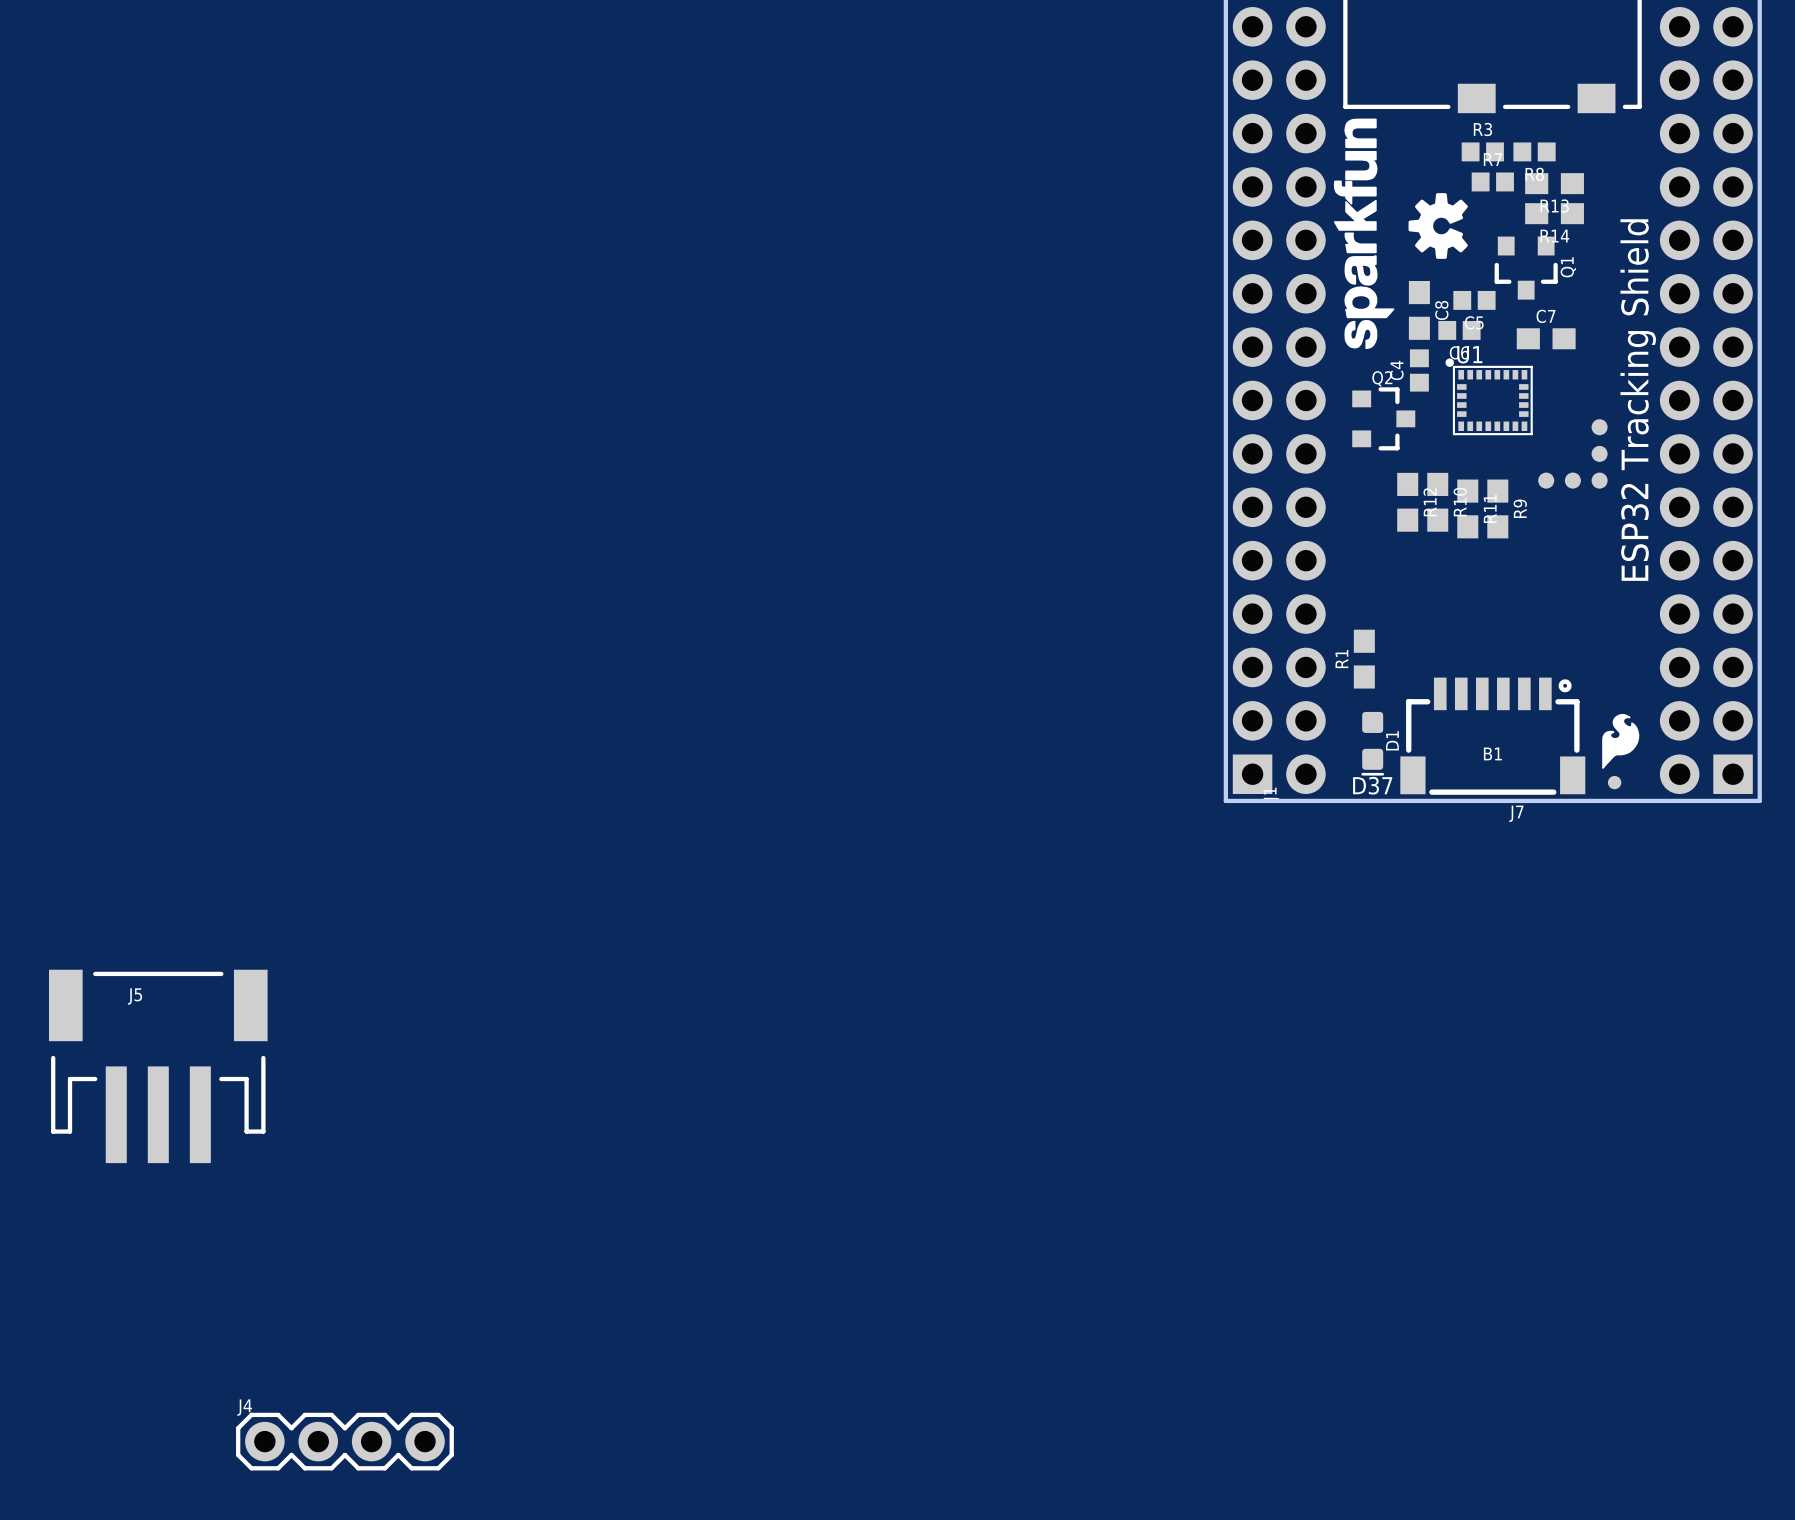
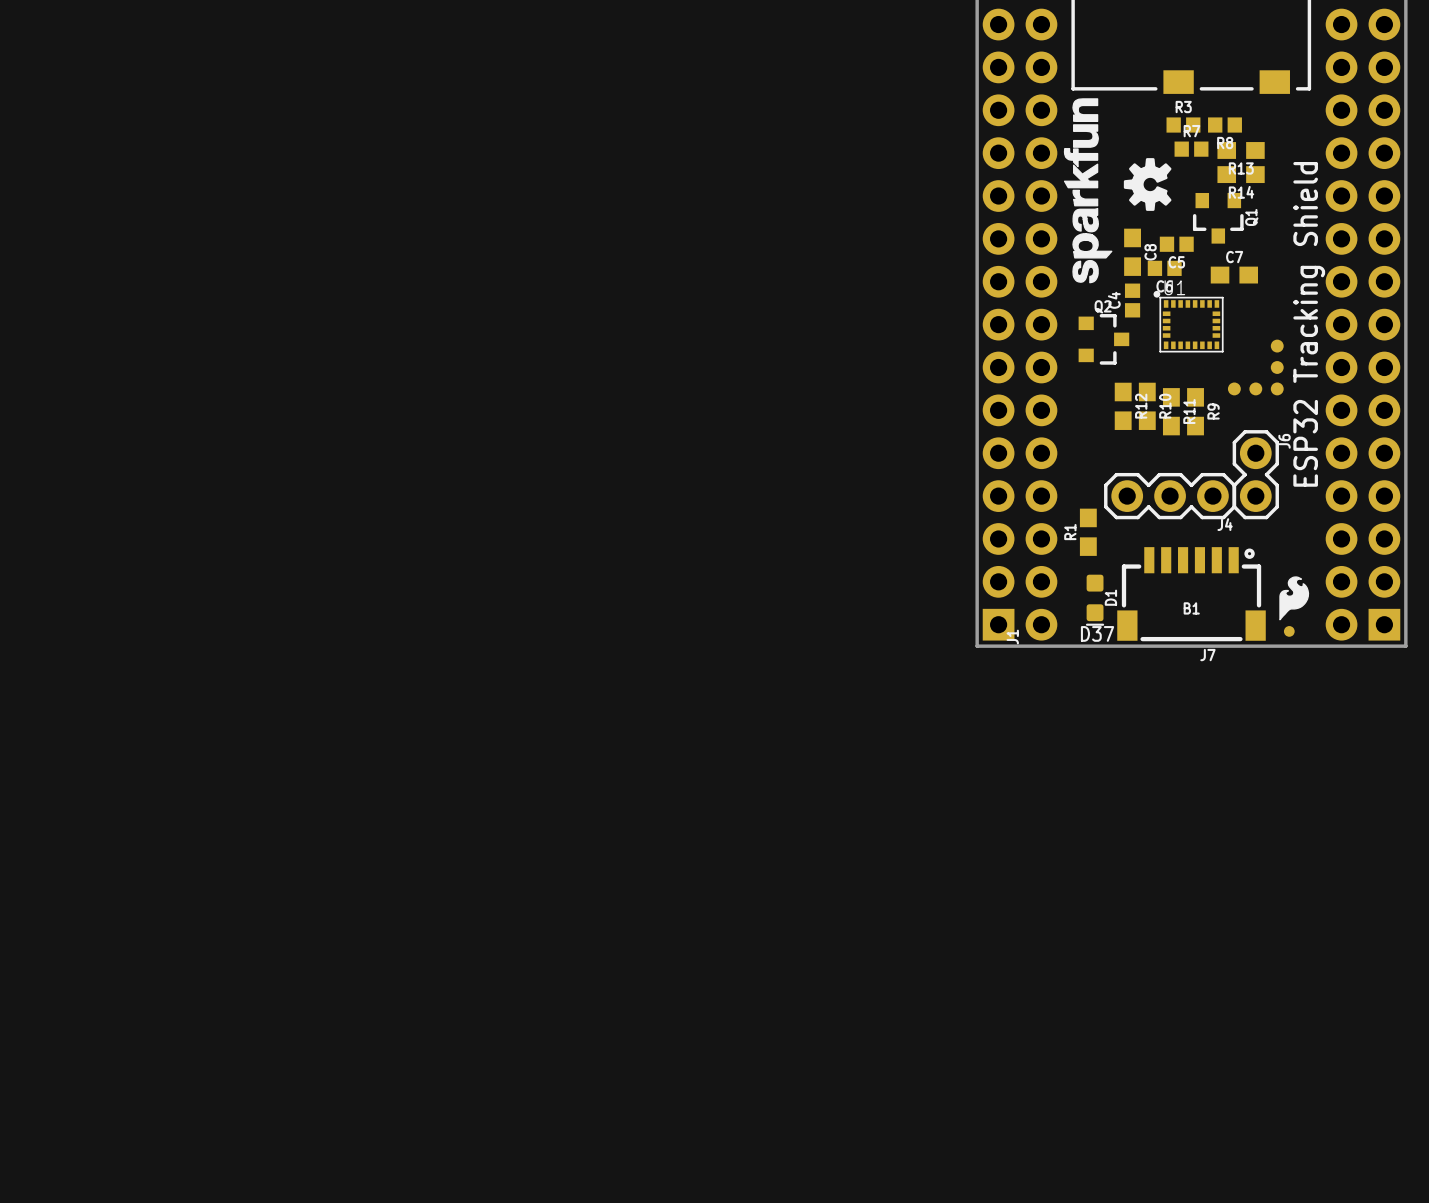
J6: none -> (1255, 474)
J5: (158, 1066) -> none
J4 name position: J4 (244, 1407) -> J4 (1225, 524)
J4 footprint: [236, 1412, 454, 1471] -> [1104, 472, 1237, 520]

